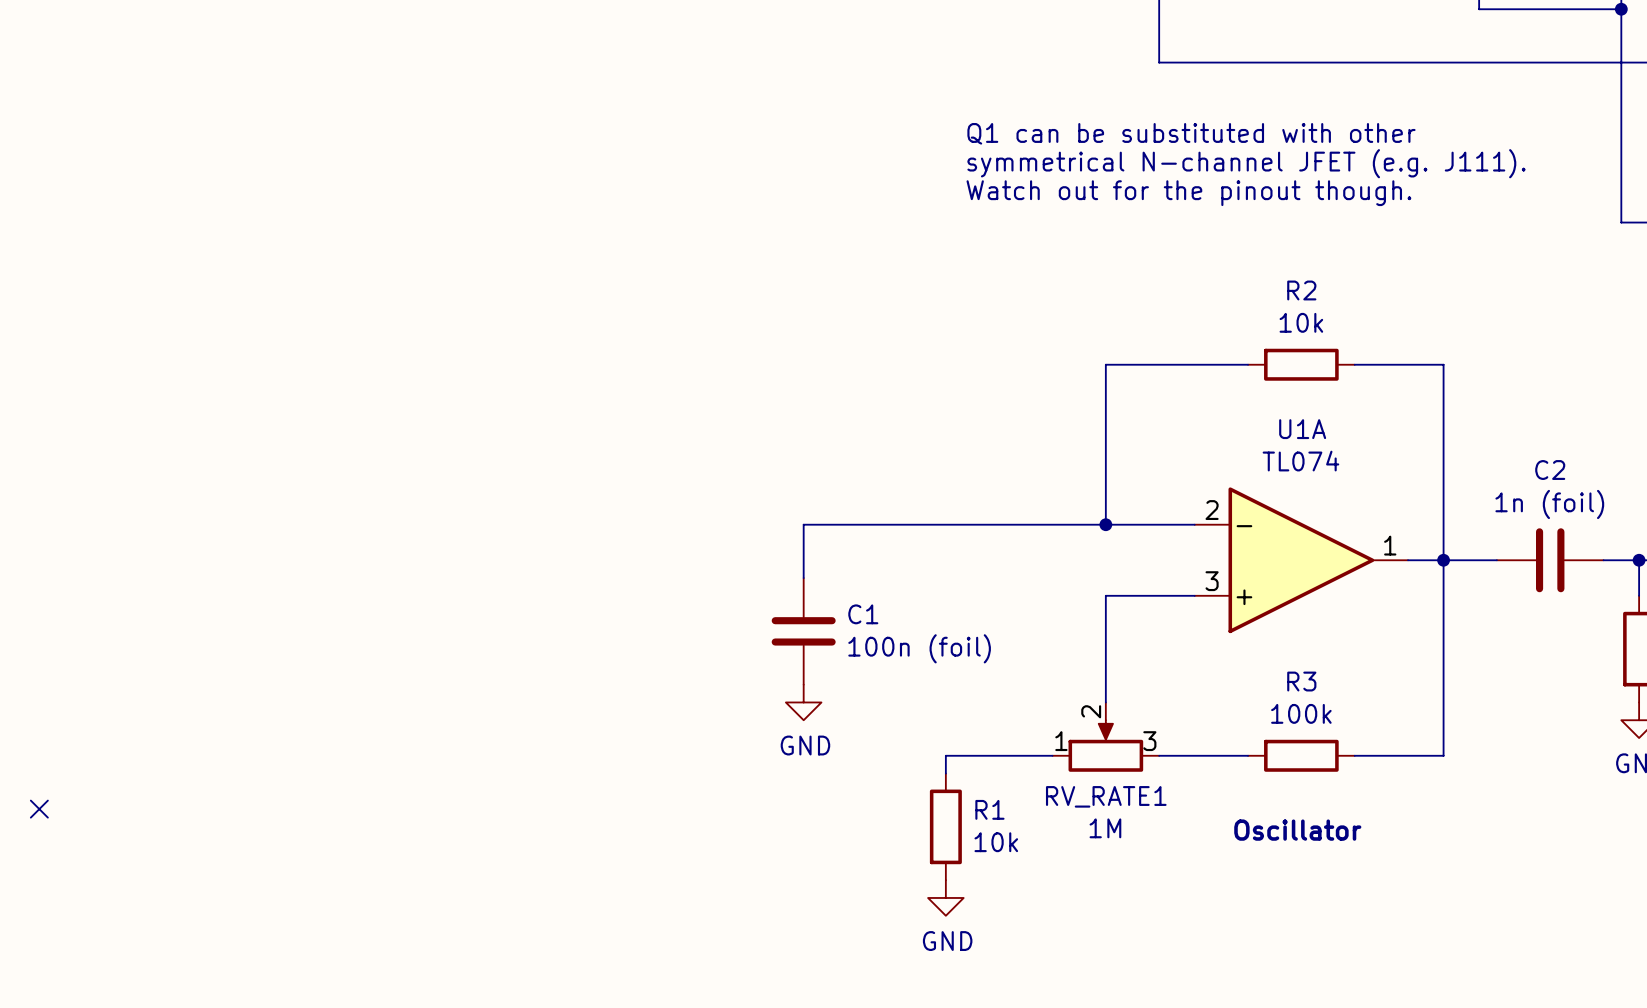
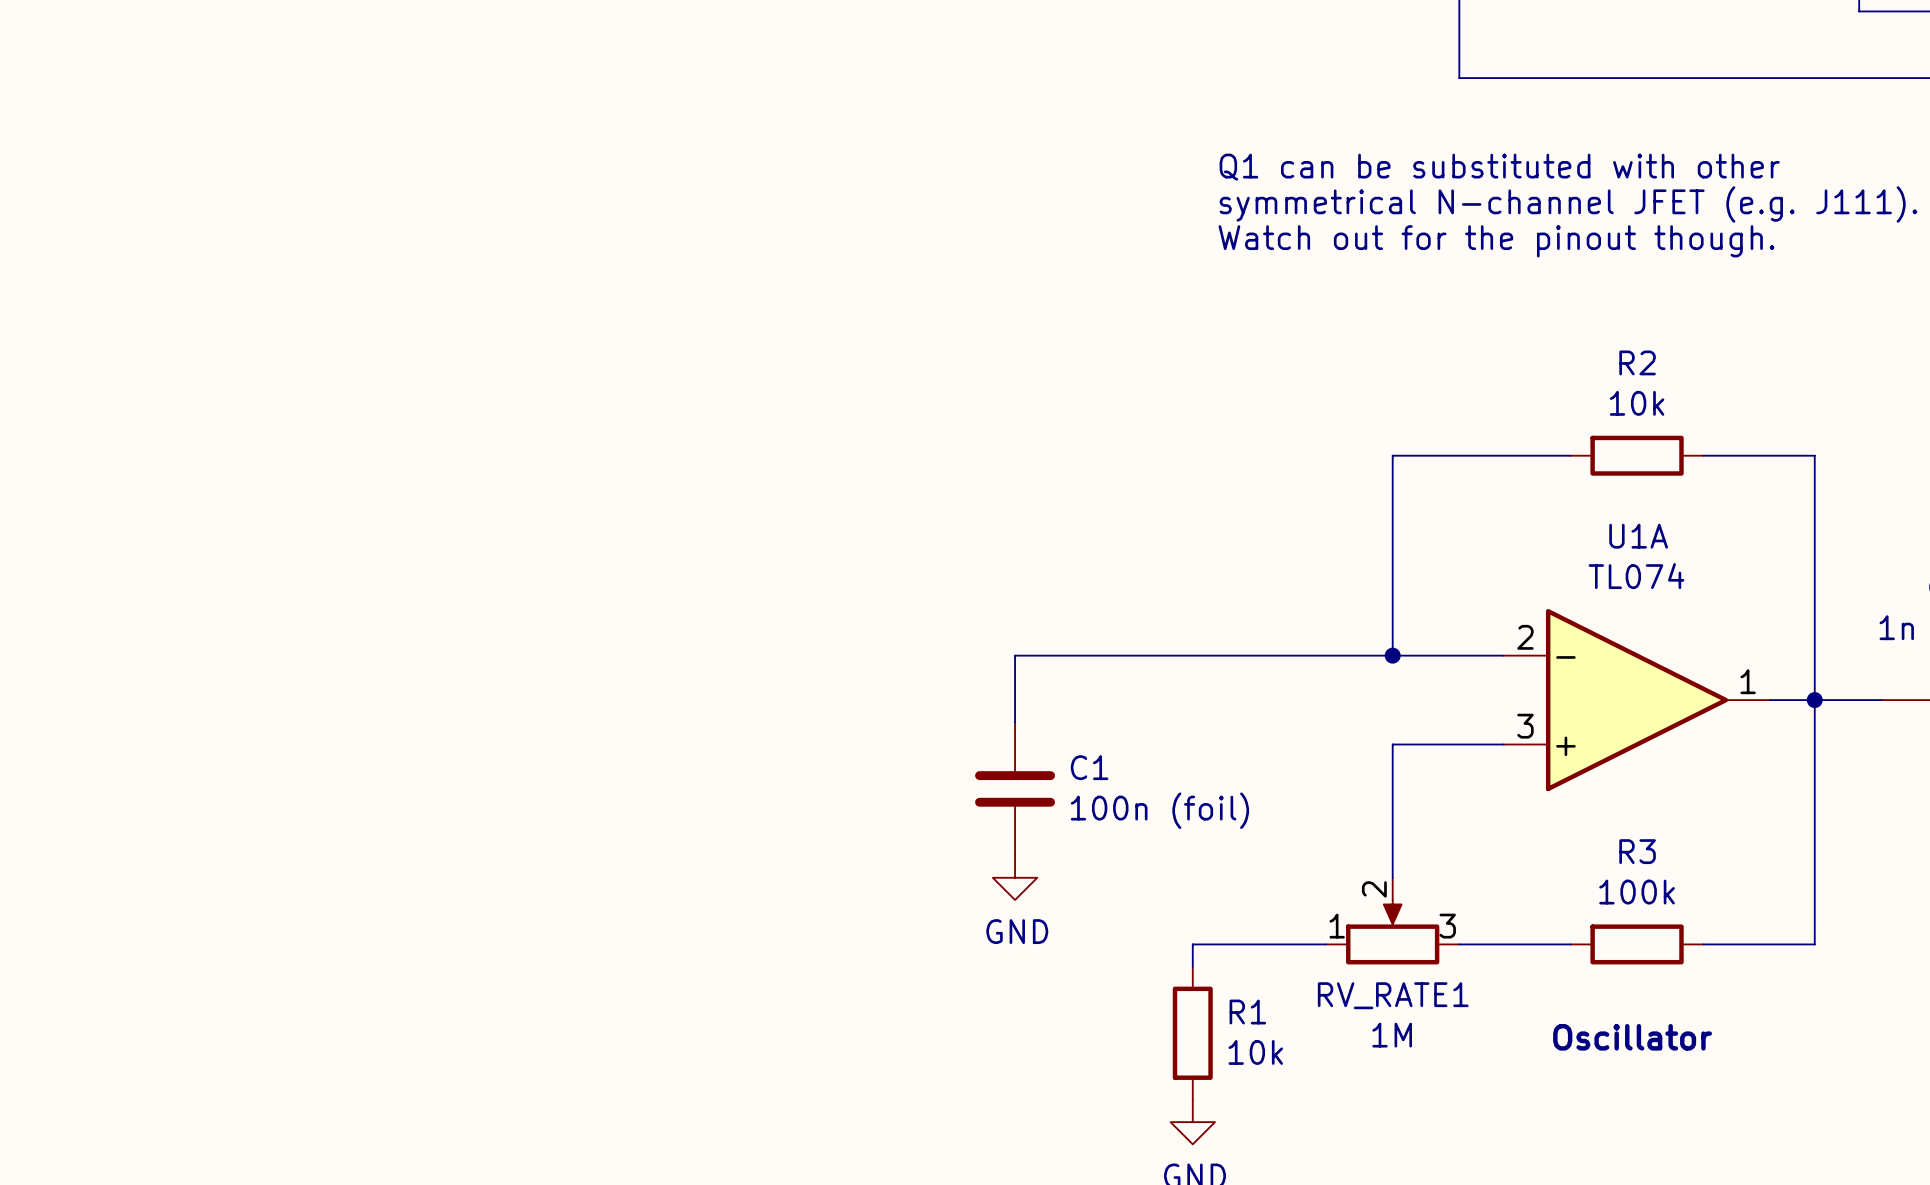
no-connect mark: (39, 809) -> none

